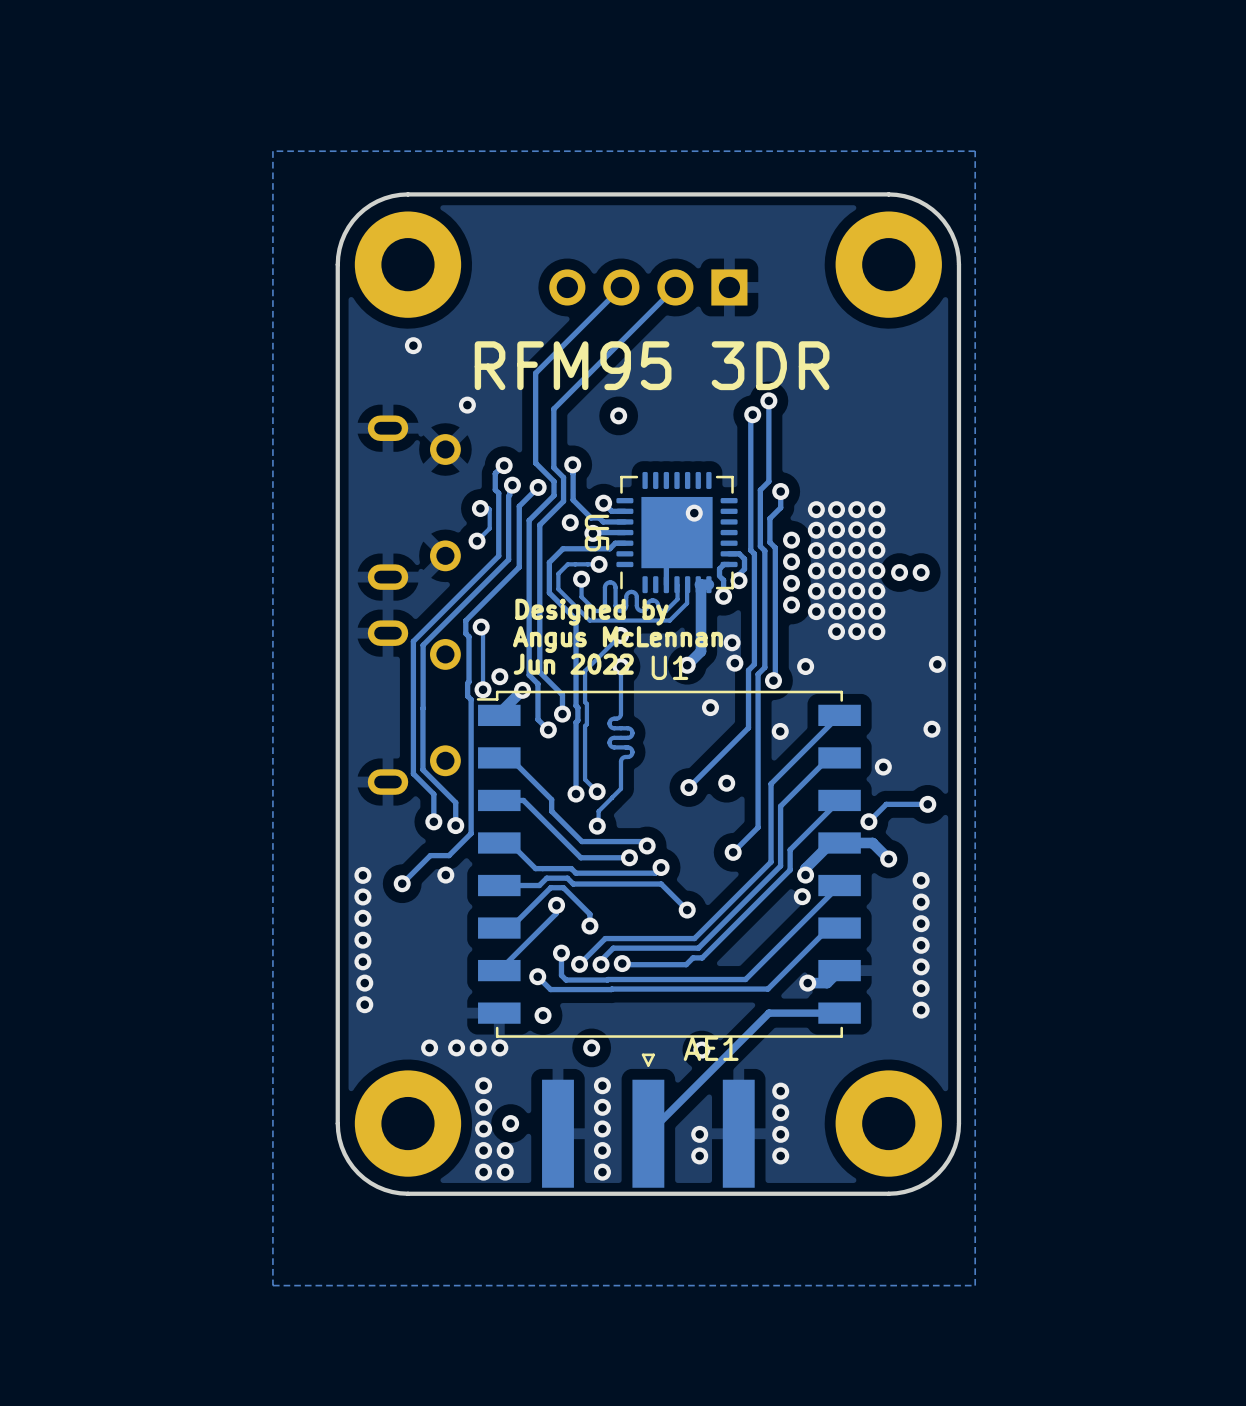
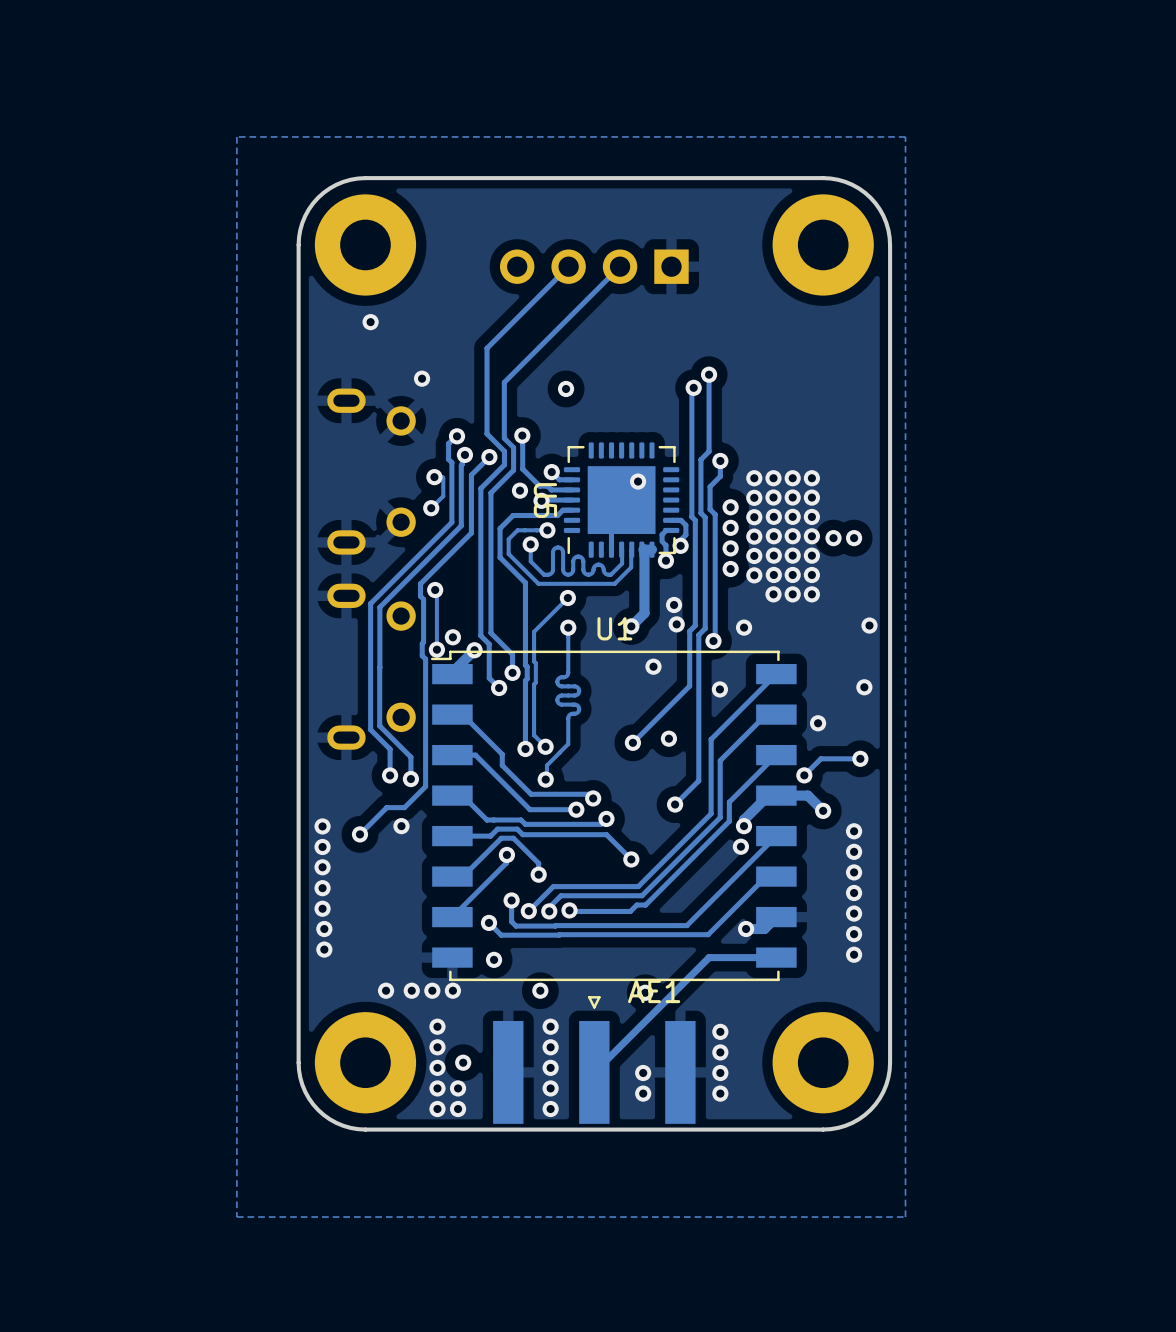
text: RFM95 3DR (652, 365) -> none
text: Designed by (592, 612) -> none
text: Angus McLennan (617, 639) -> none
text: Jun 2022 (573, 664) -> none

